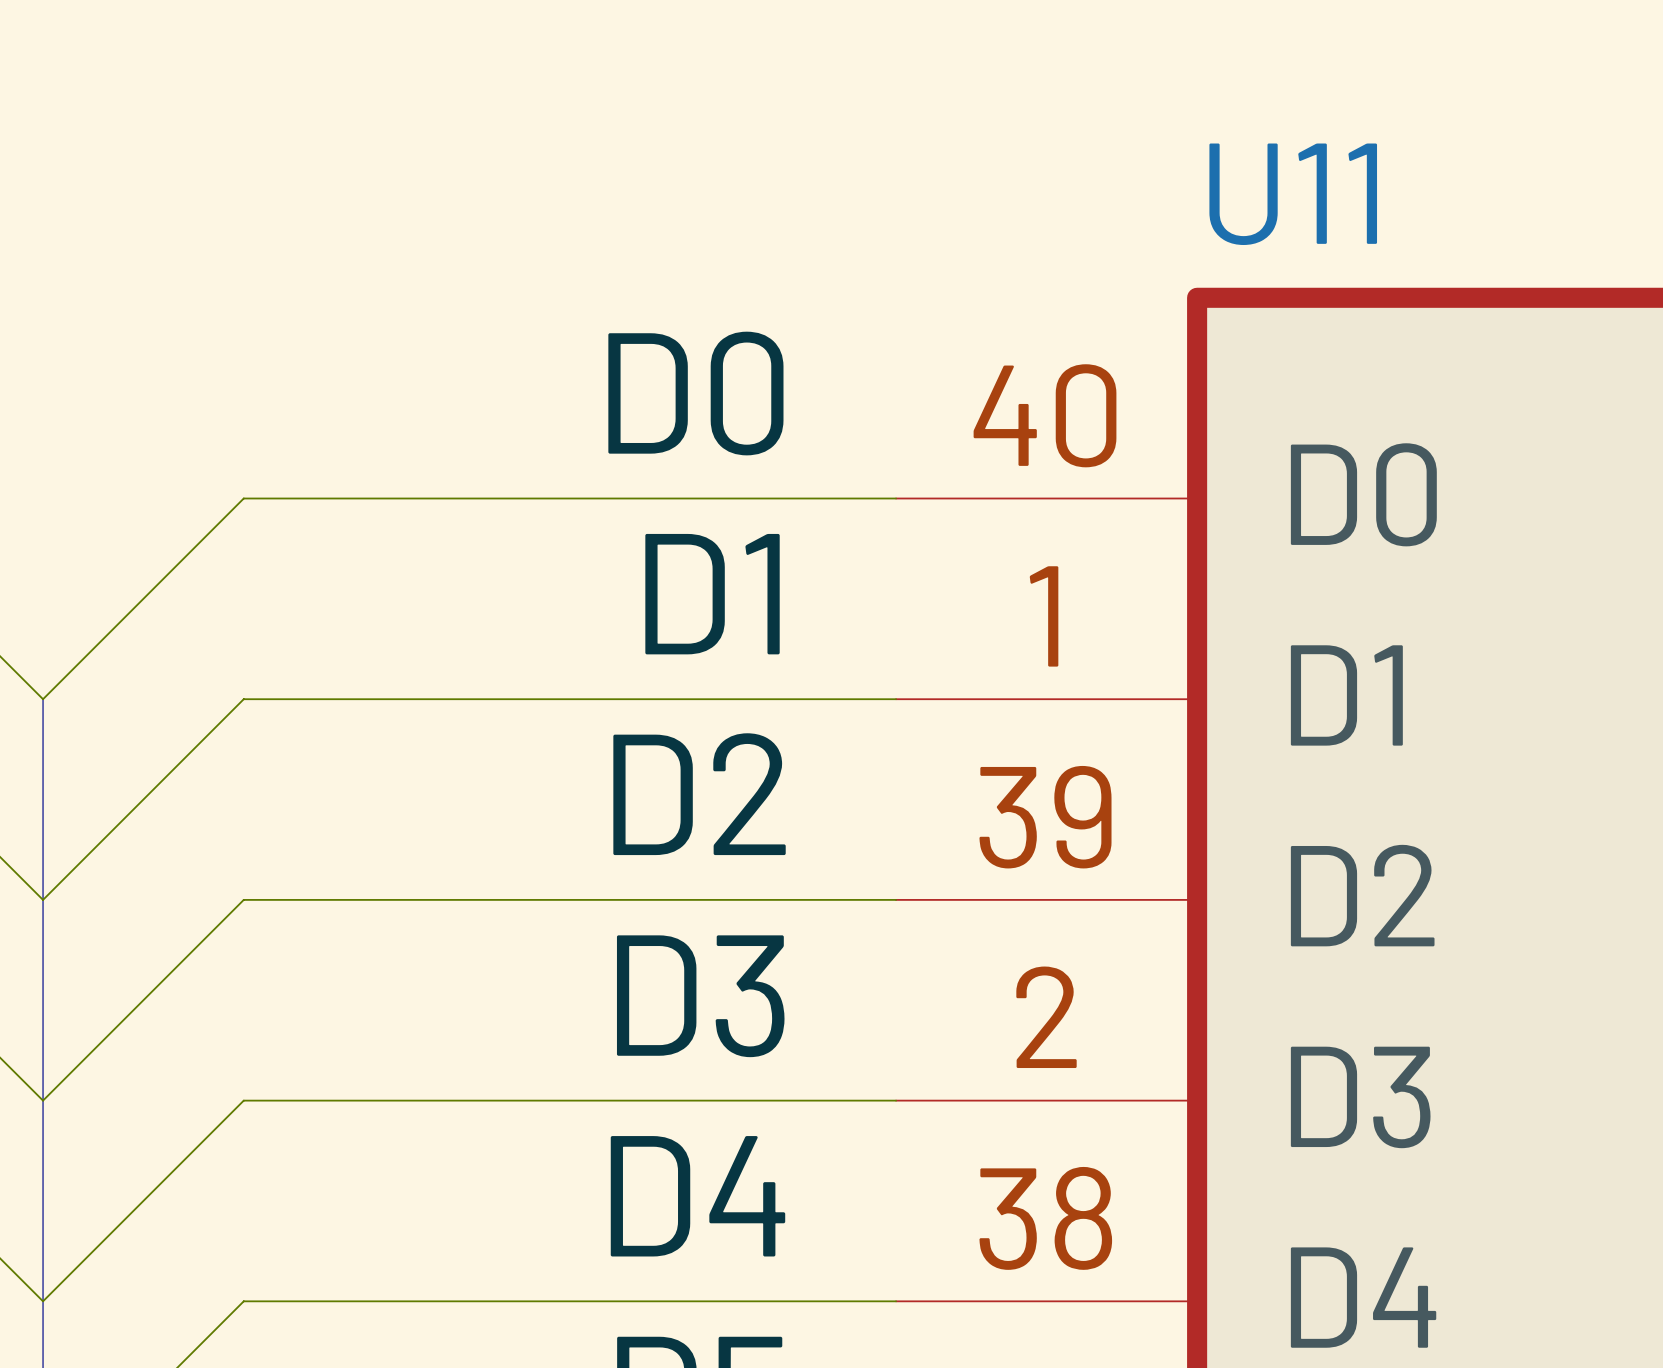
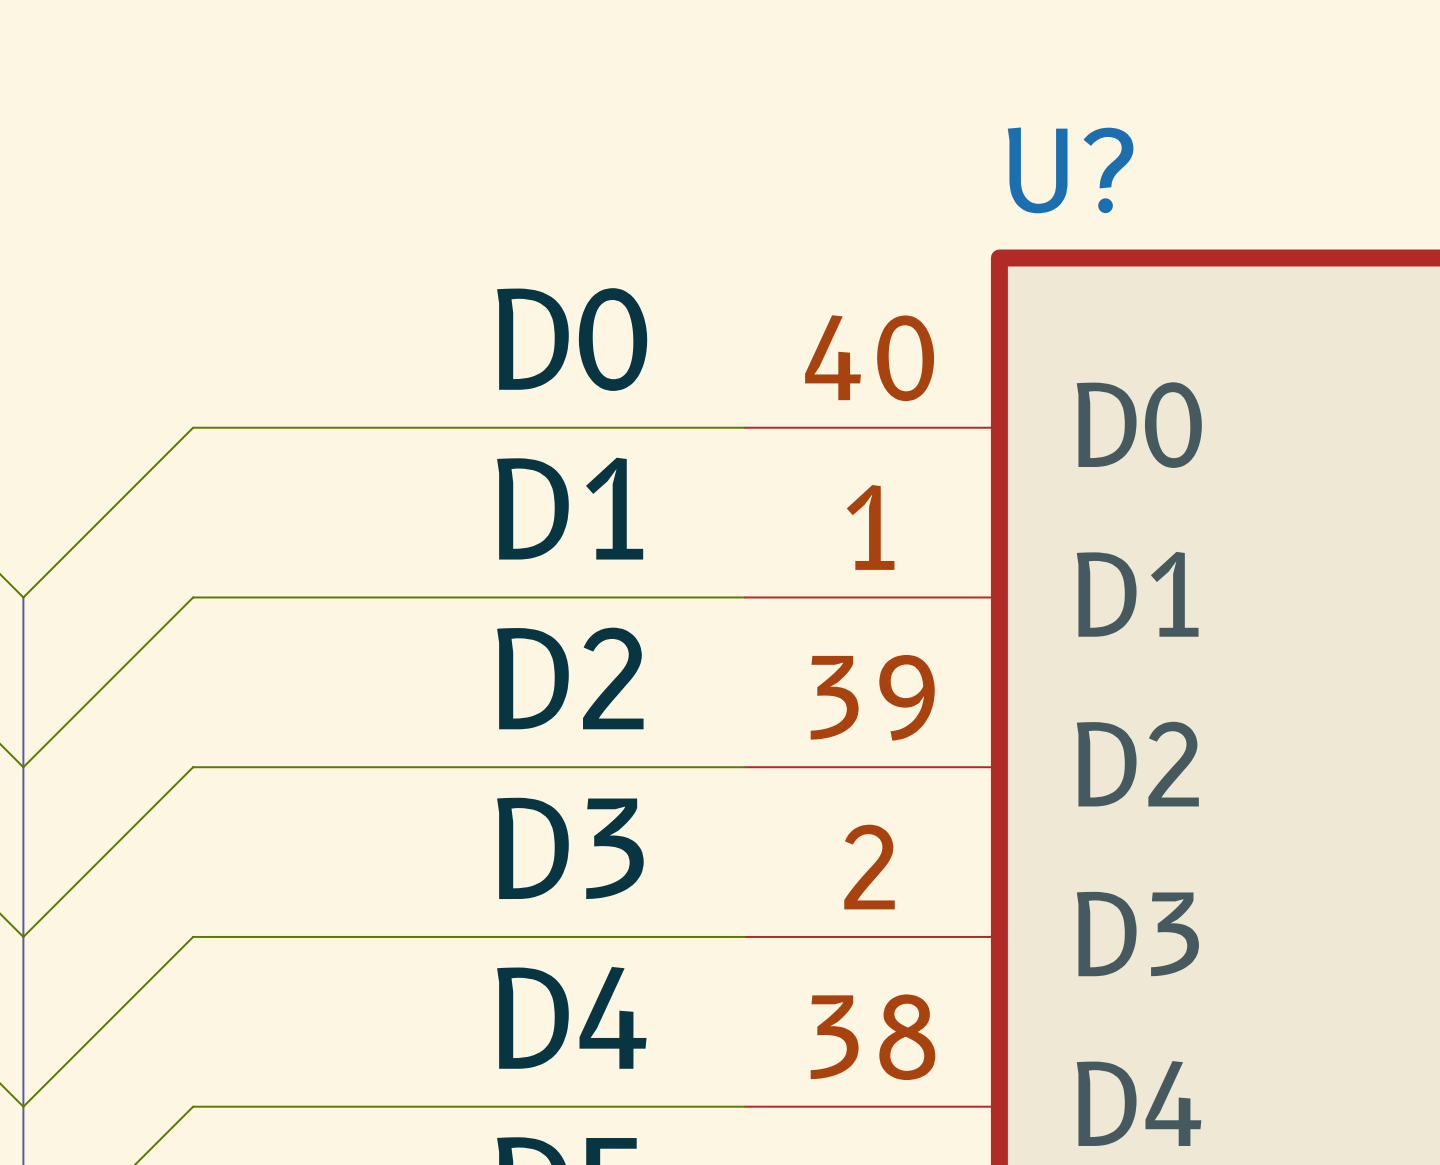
U11 name: U11 (1293, 194) -> U? (1070, 170)

